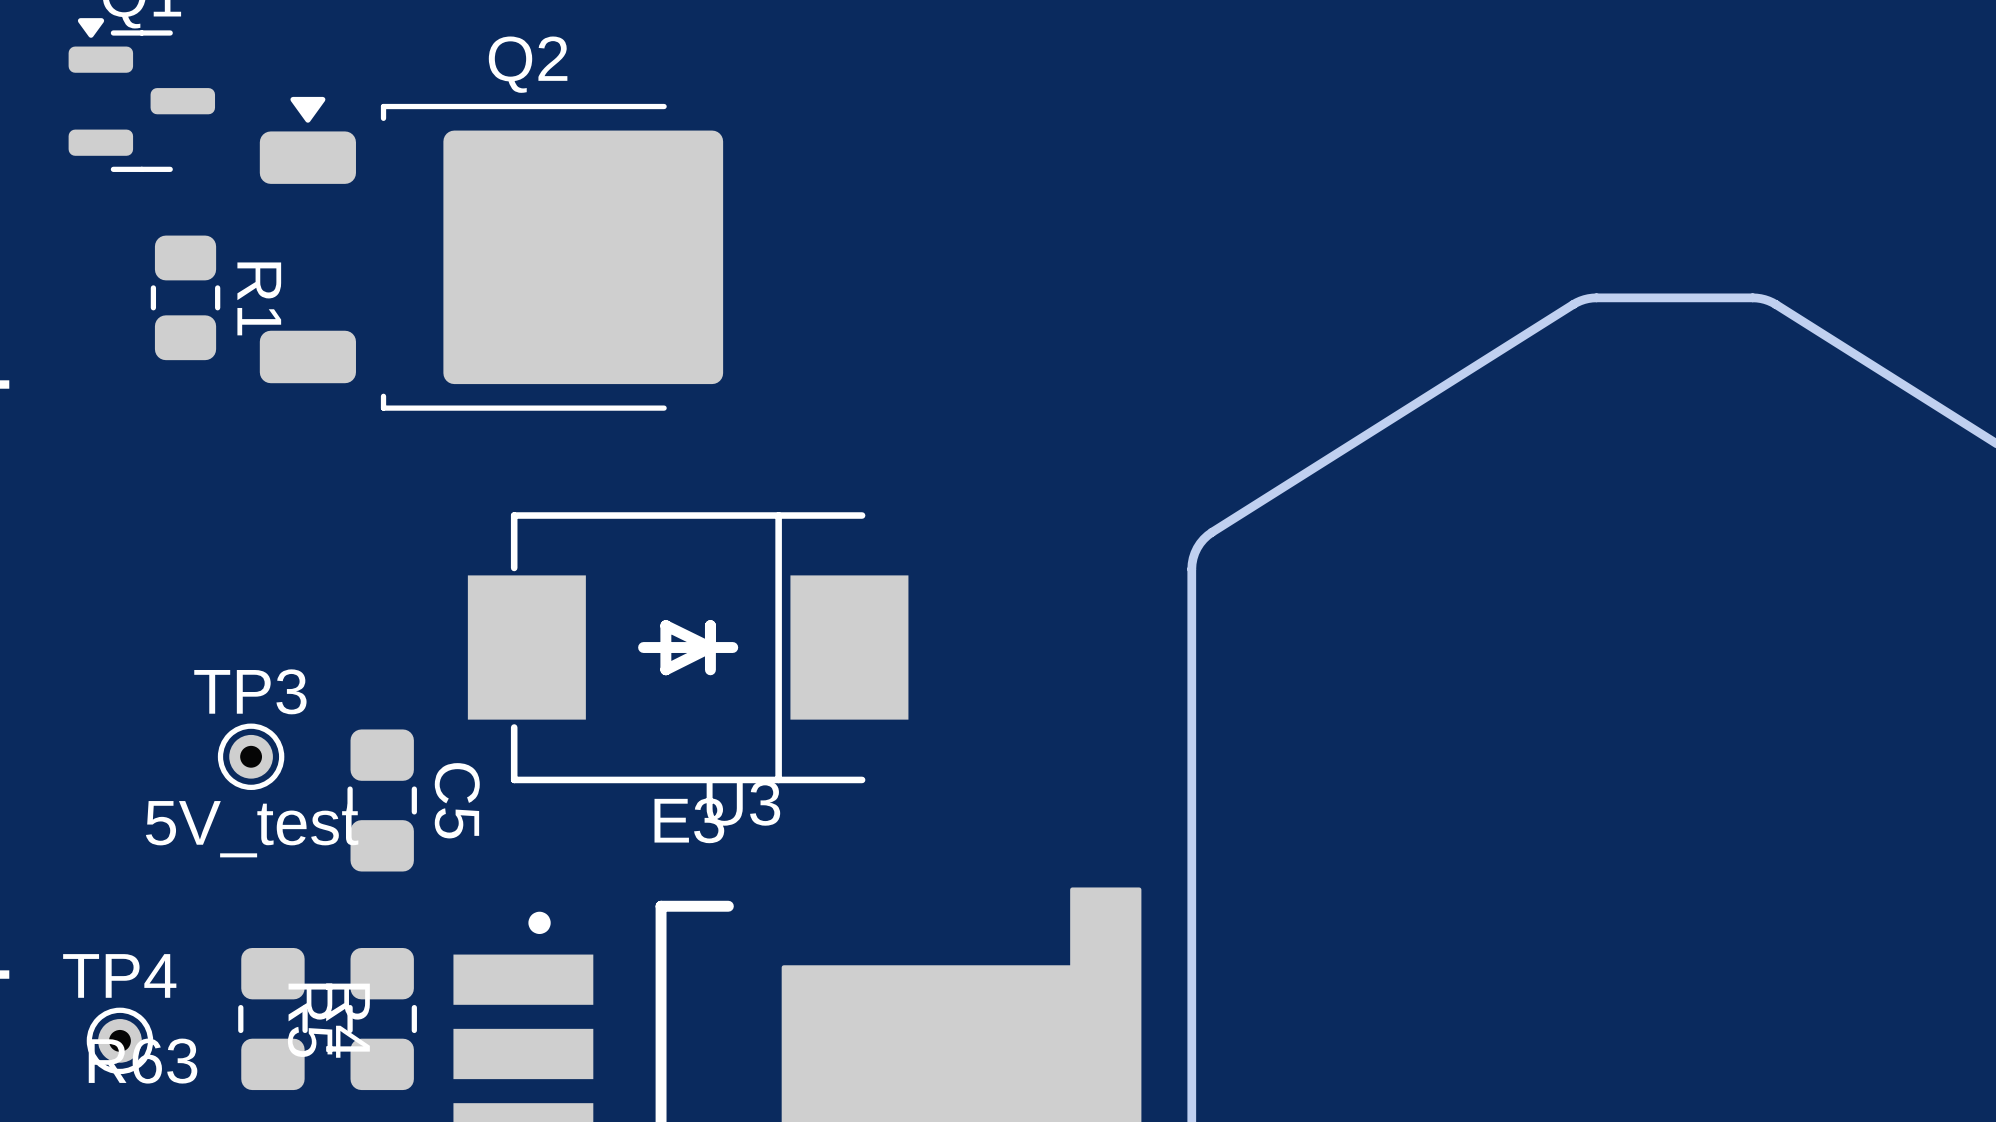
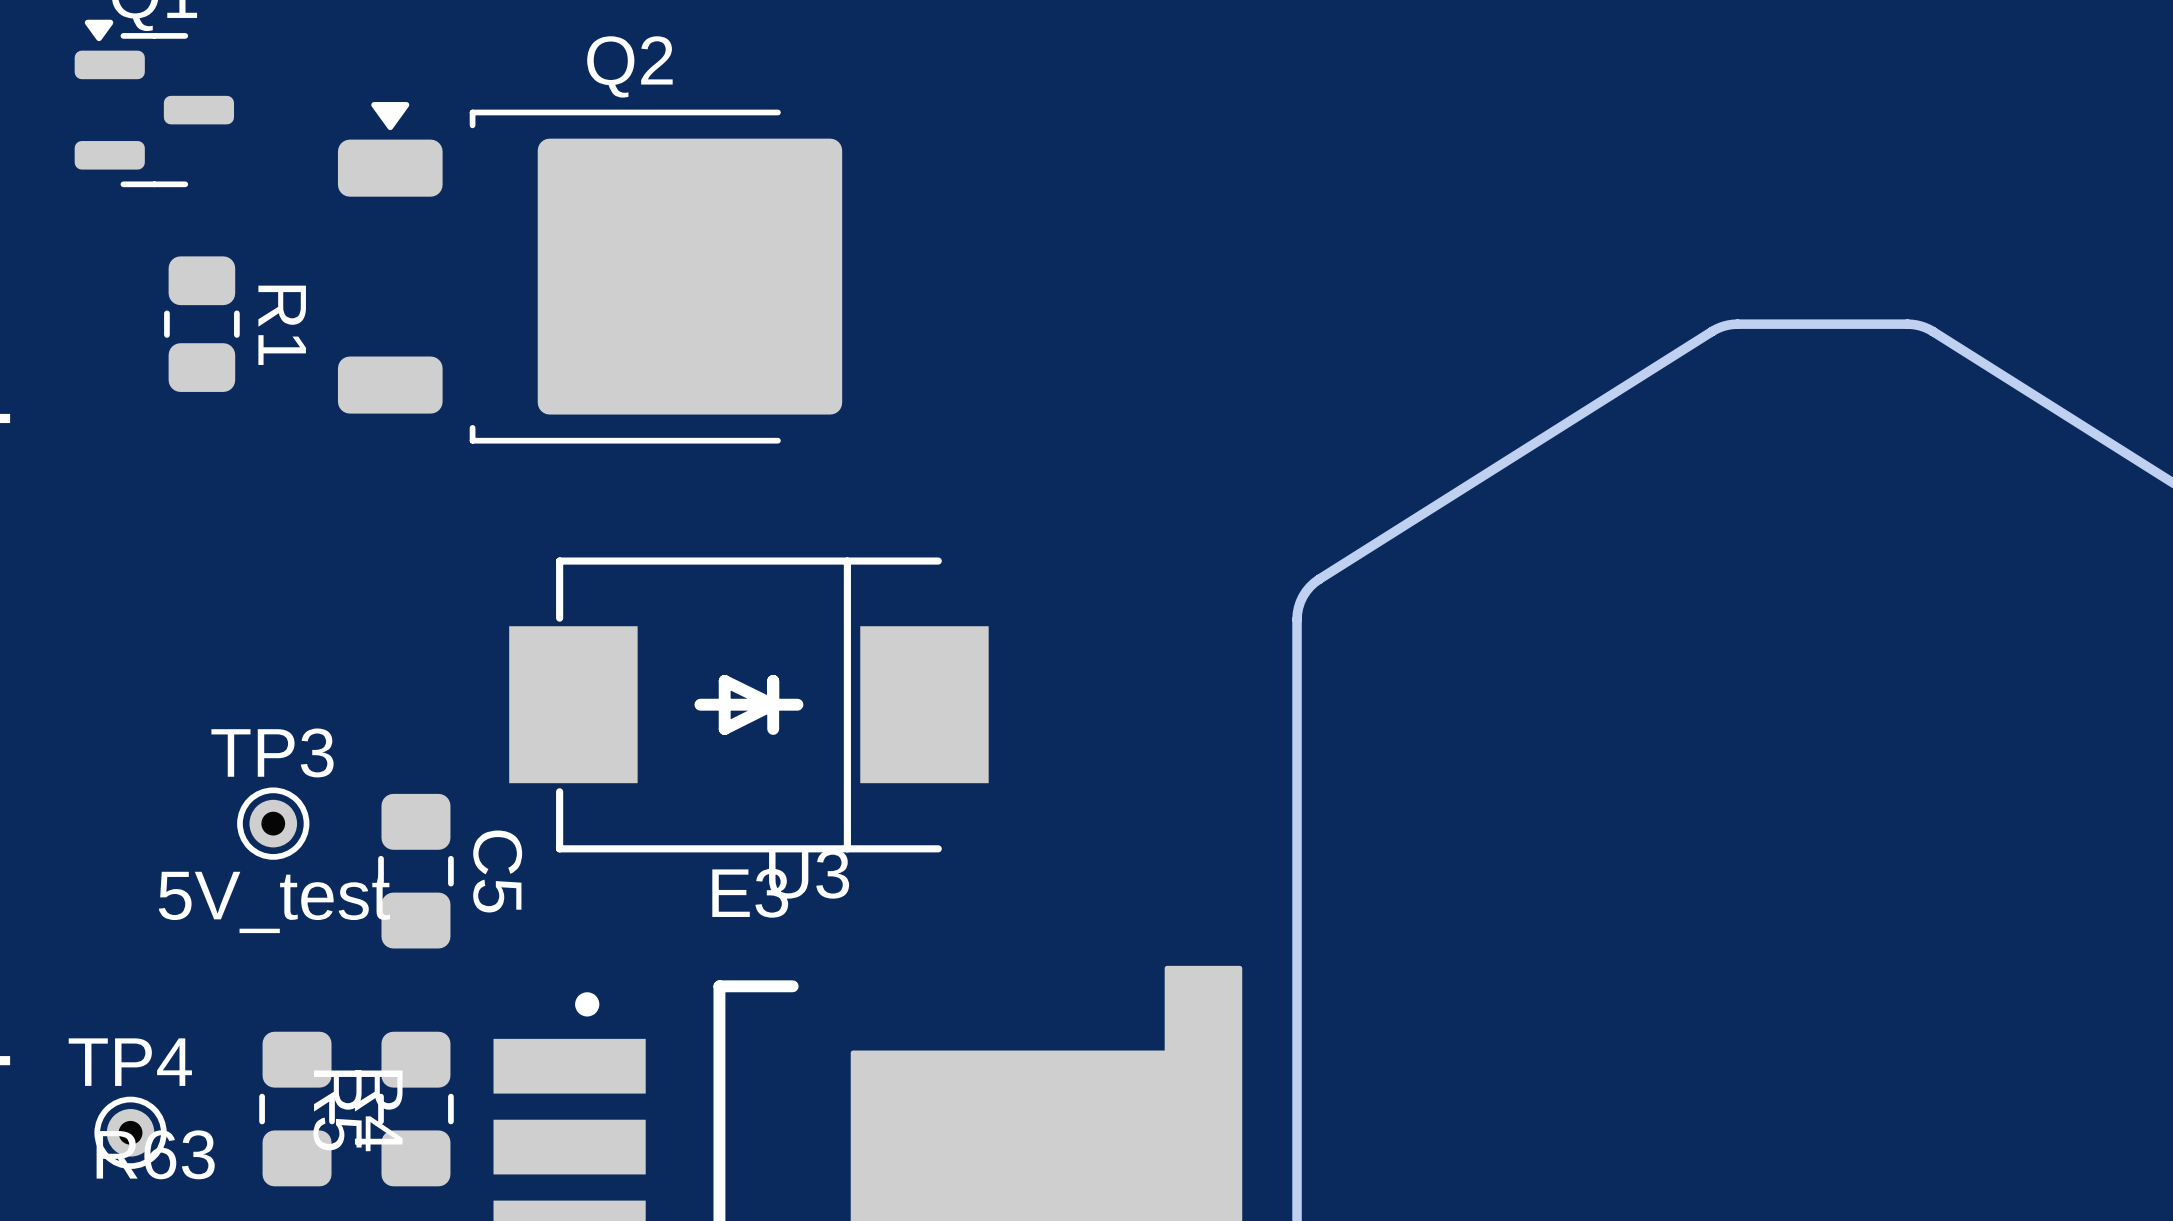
Q2 position: (491, 253) -> (590, 272)

